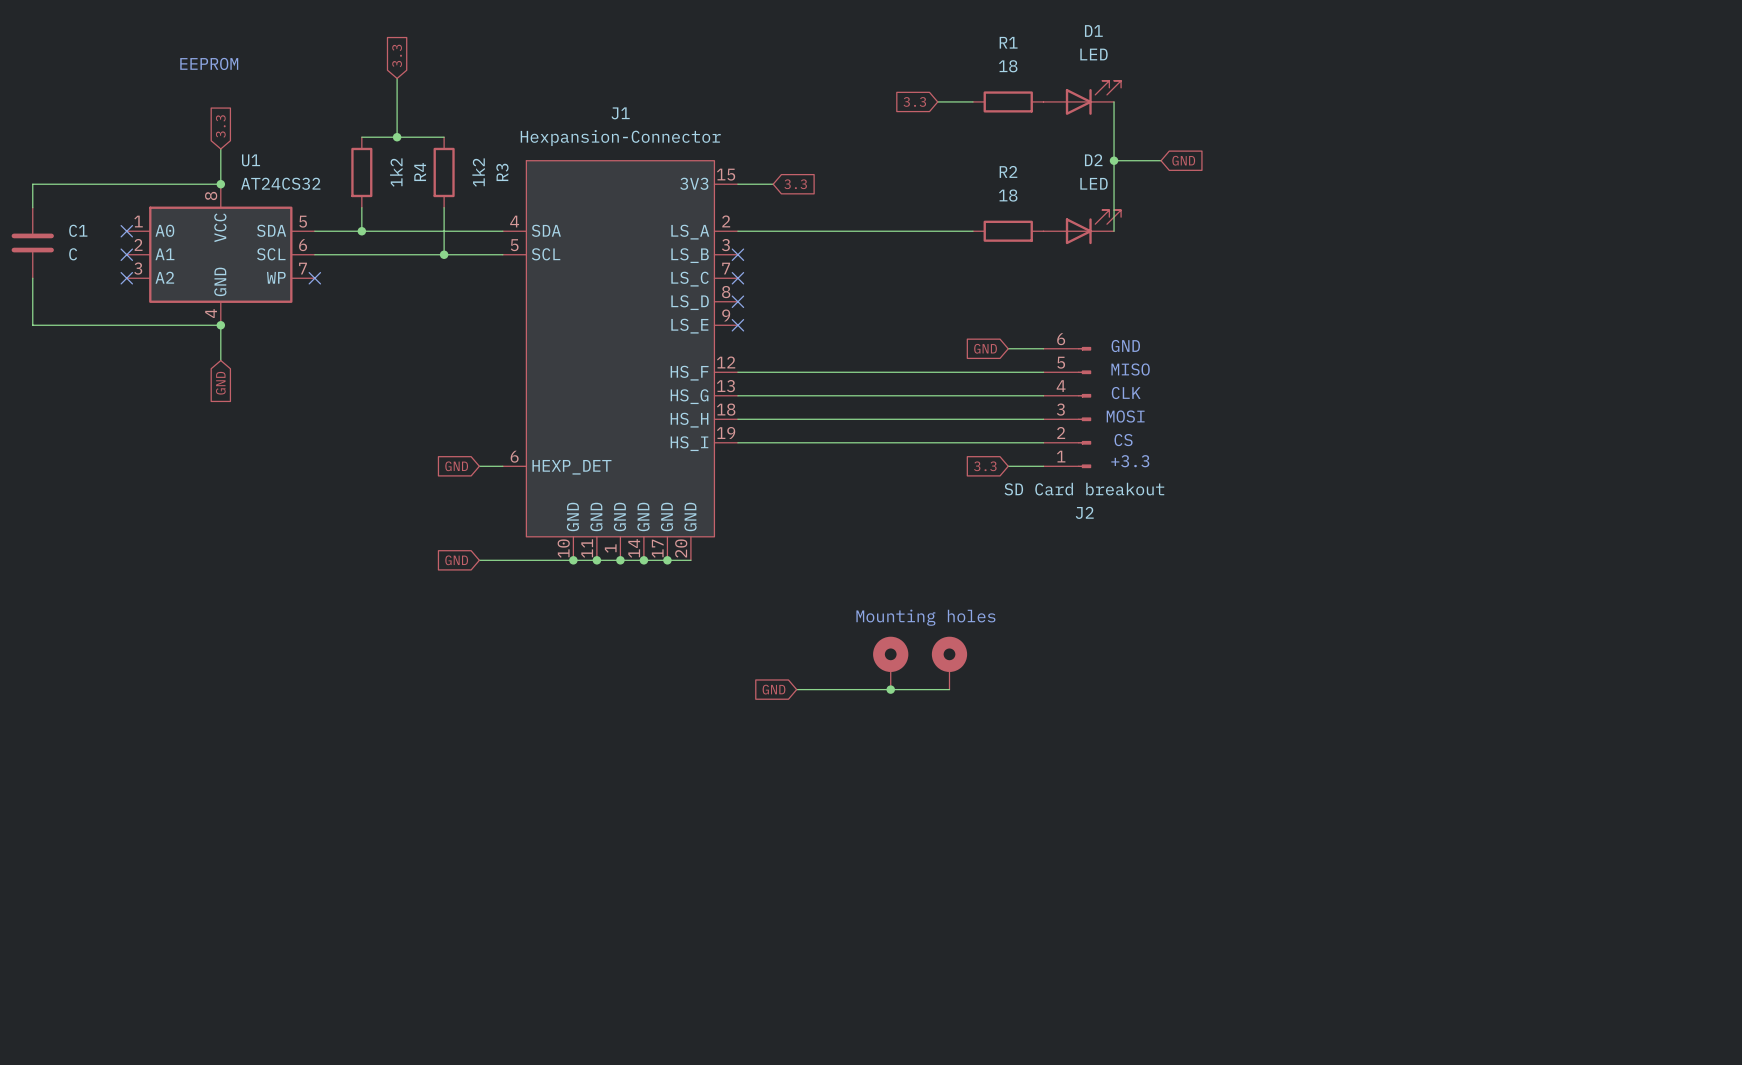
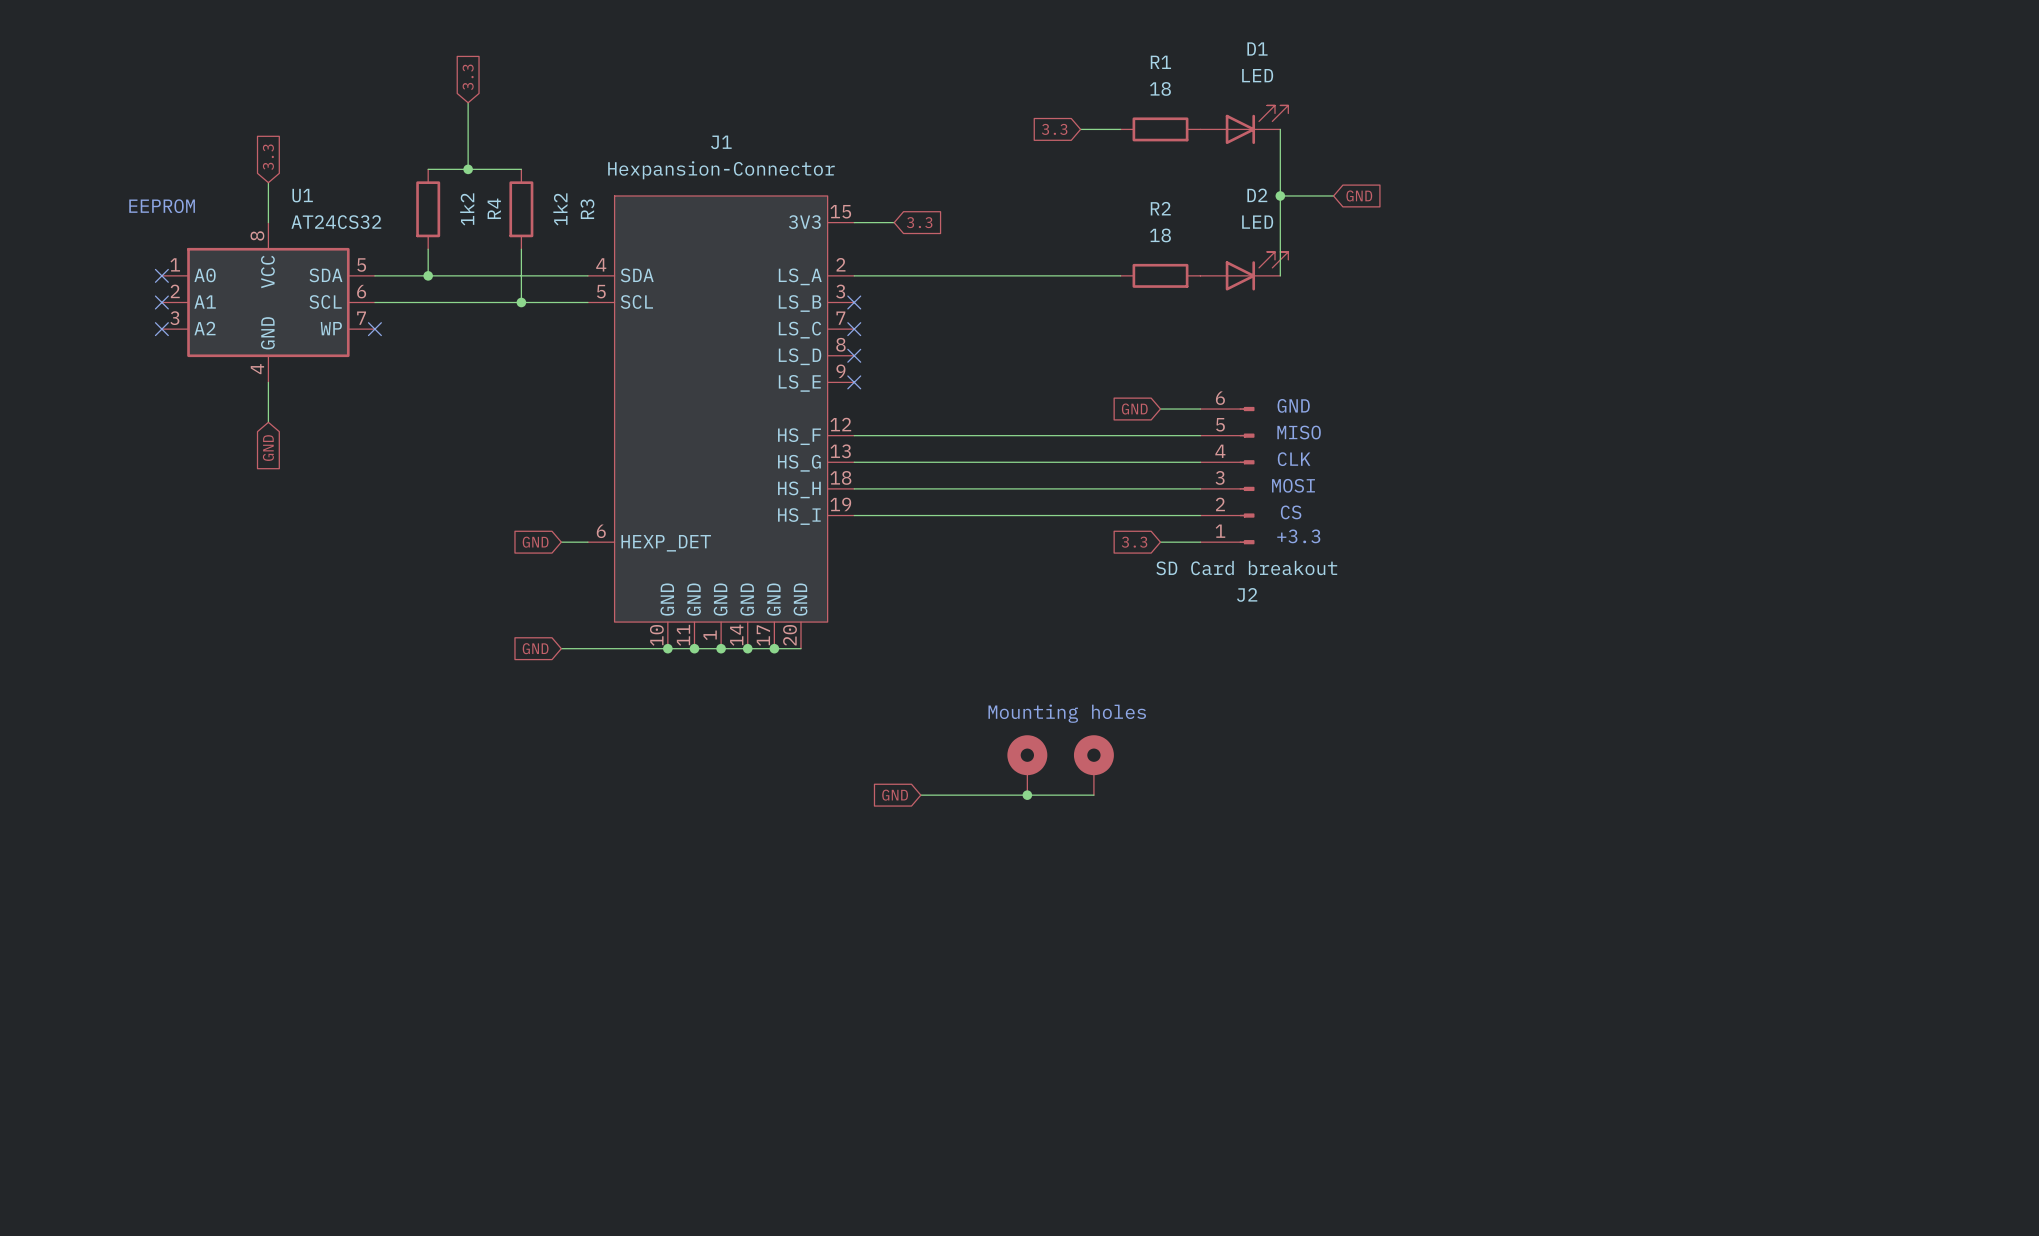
text position: EEPROM (209, 63) -> EEPROM (162, 206)
wire: (220, 184) (32, 184) (32, 207) -> none
junction: (220, 184) -> none
C1: C (32, 242) -> none
wire: (32, 278) (32, 325) (220, 325) -> none
junction: (220, 325) -> none

